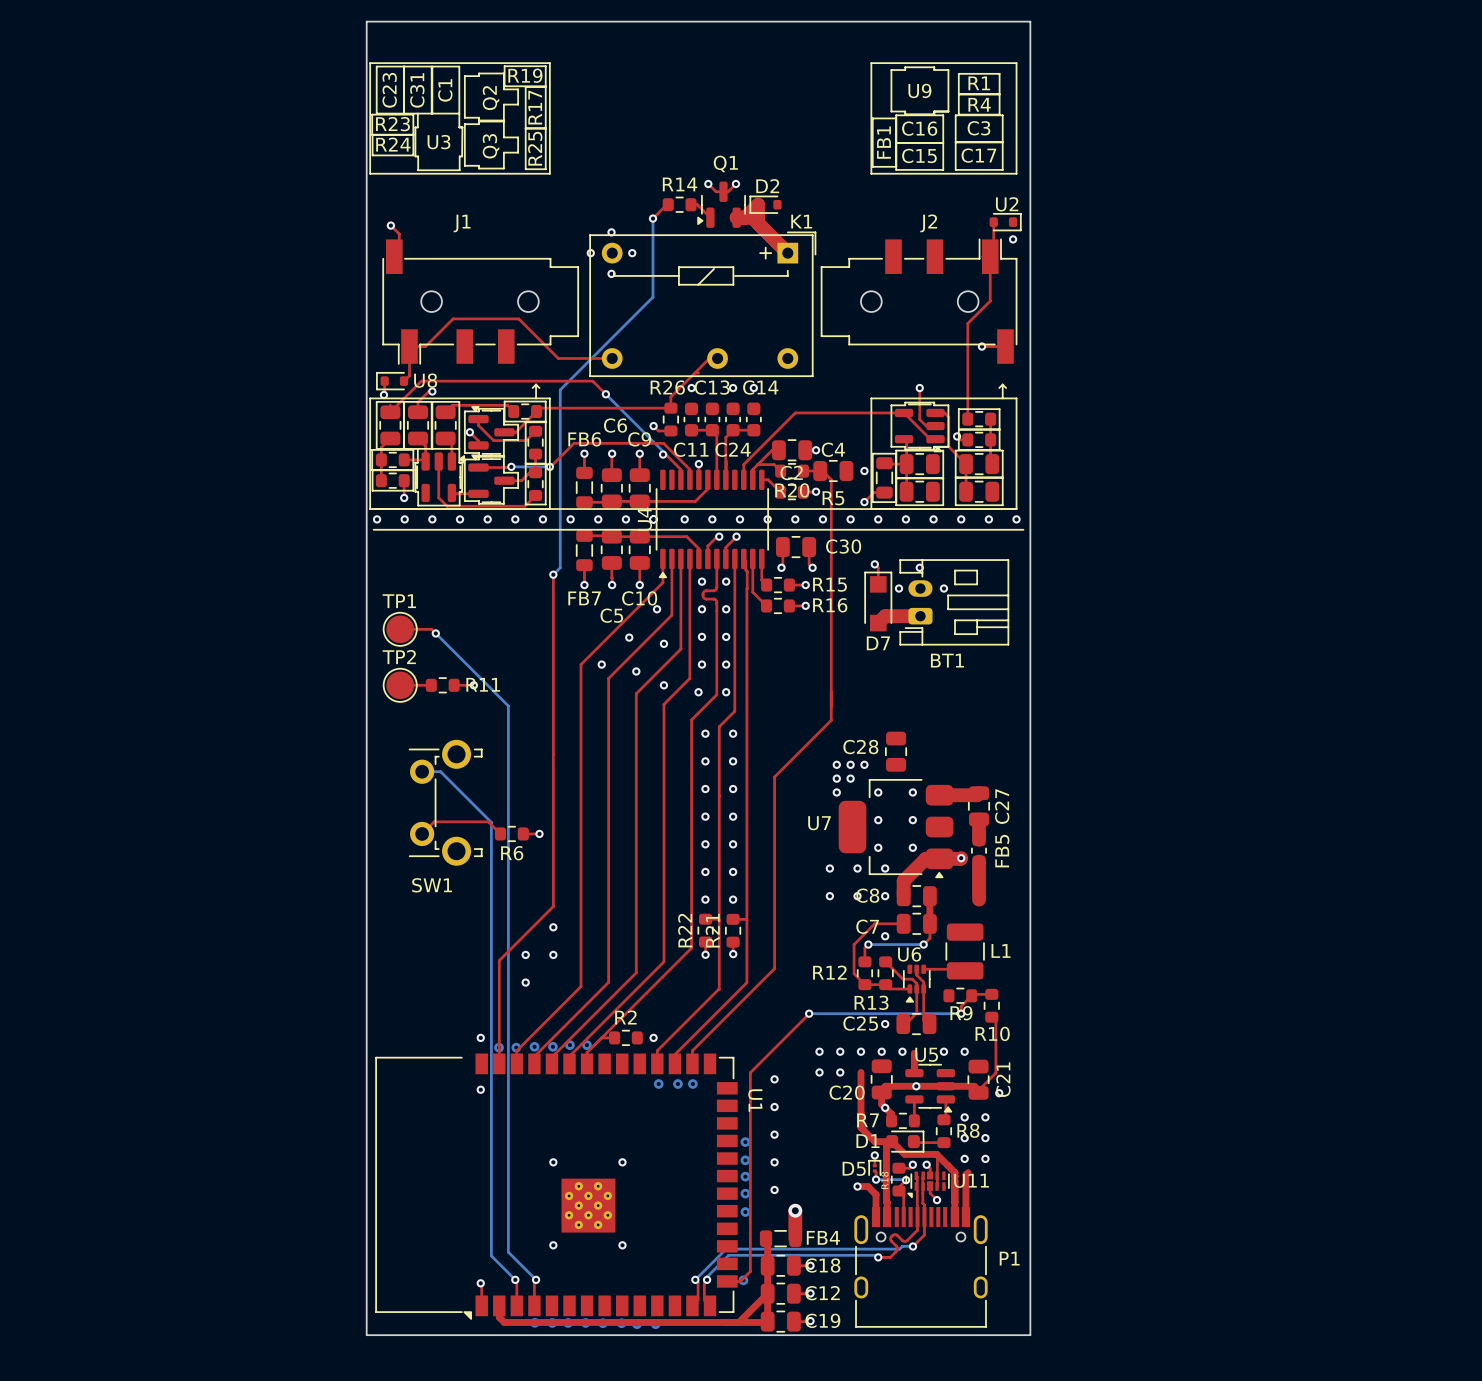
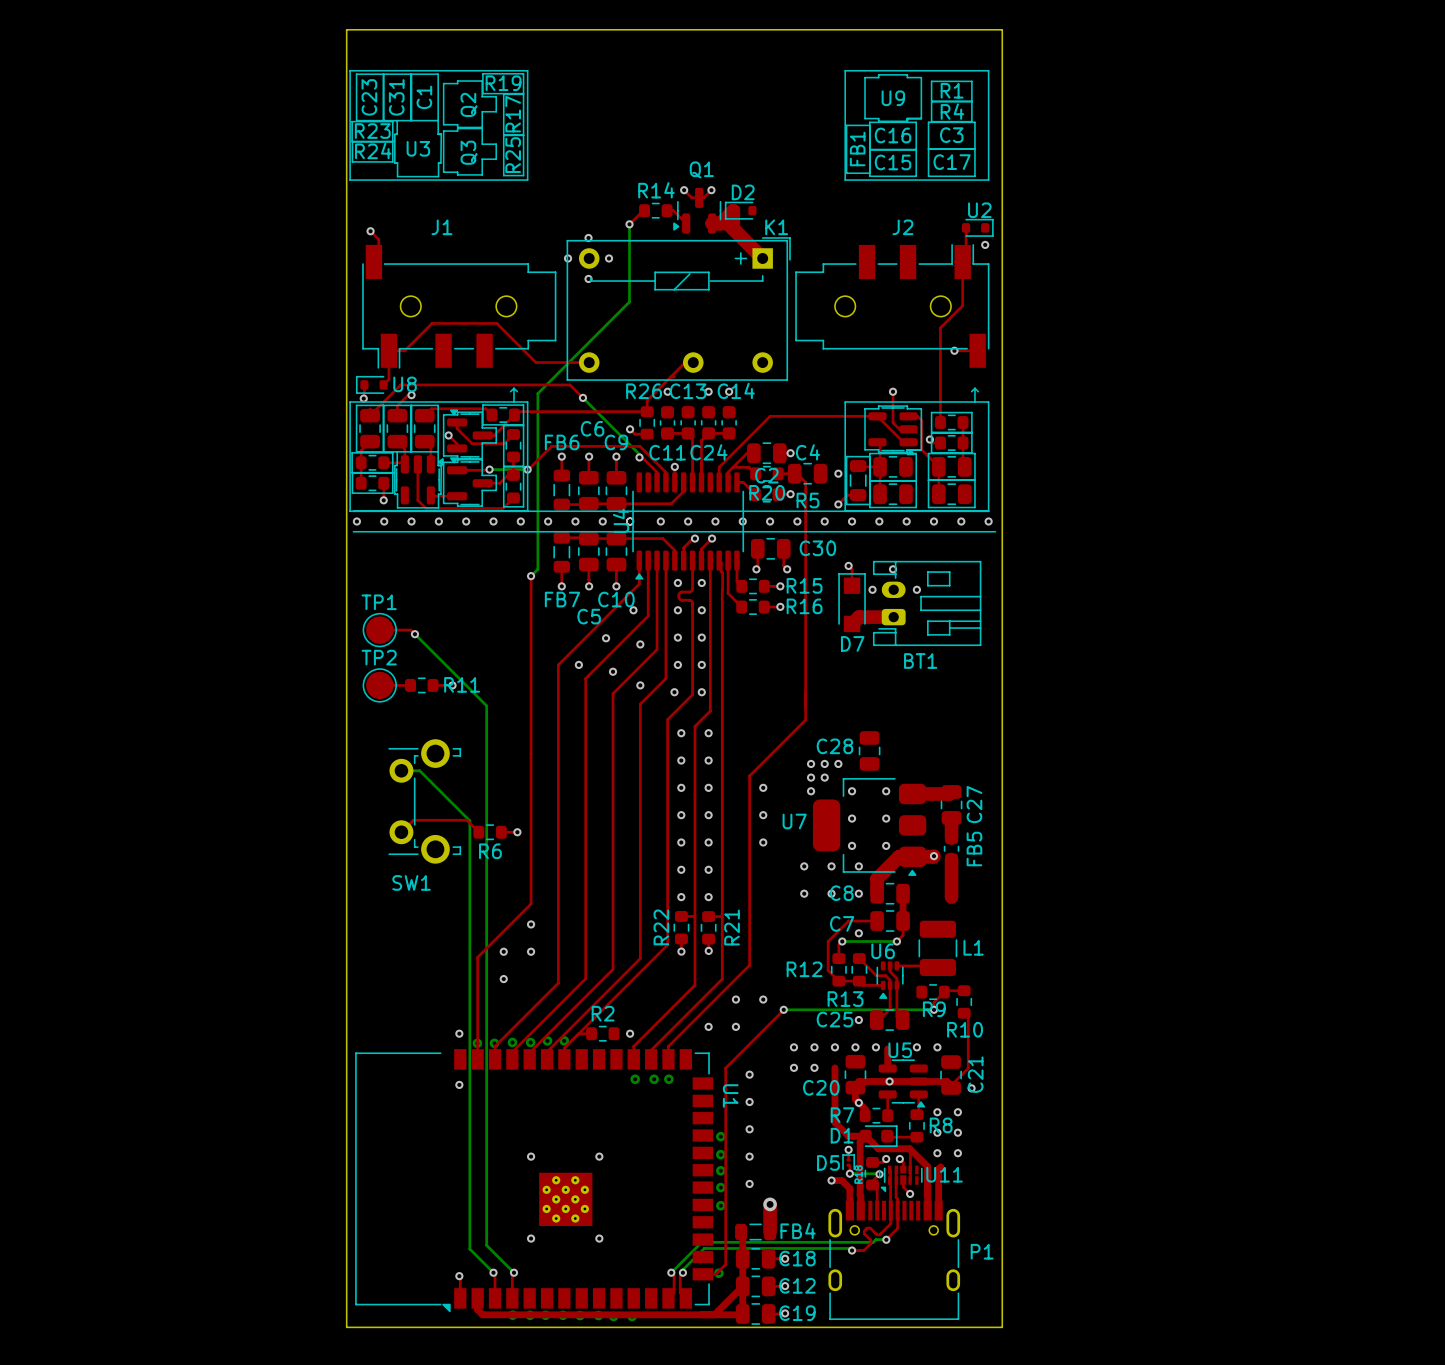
via: none -> (763, 787)
via: none -> (763, 815)
via: none -> (763, 842)
R21 name position: R21 (712, 930) -> R21 (732, 927)
via: none -> (735, 999)
via: none -> (763, 999)
via: none -> (708, 1026)
via: none -> (735, 1026)

